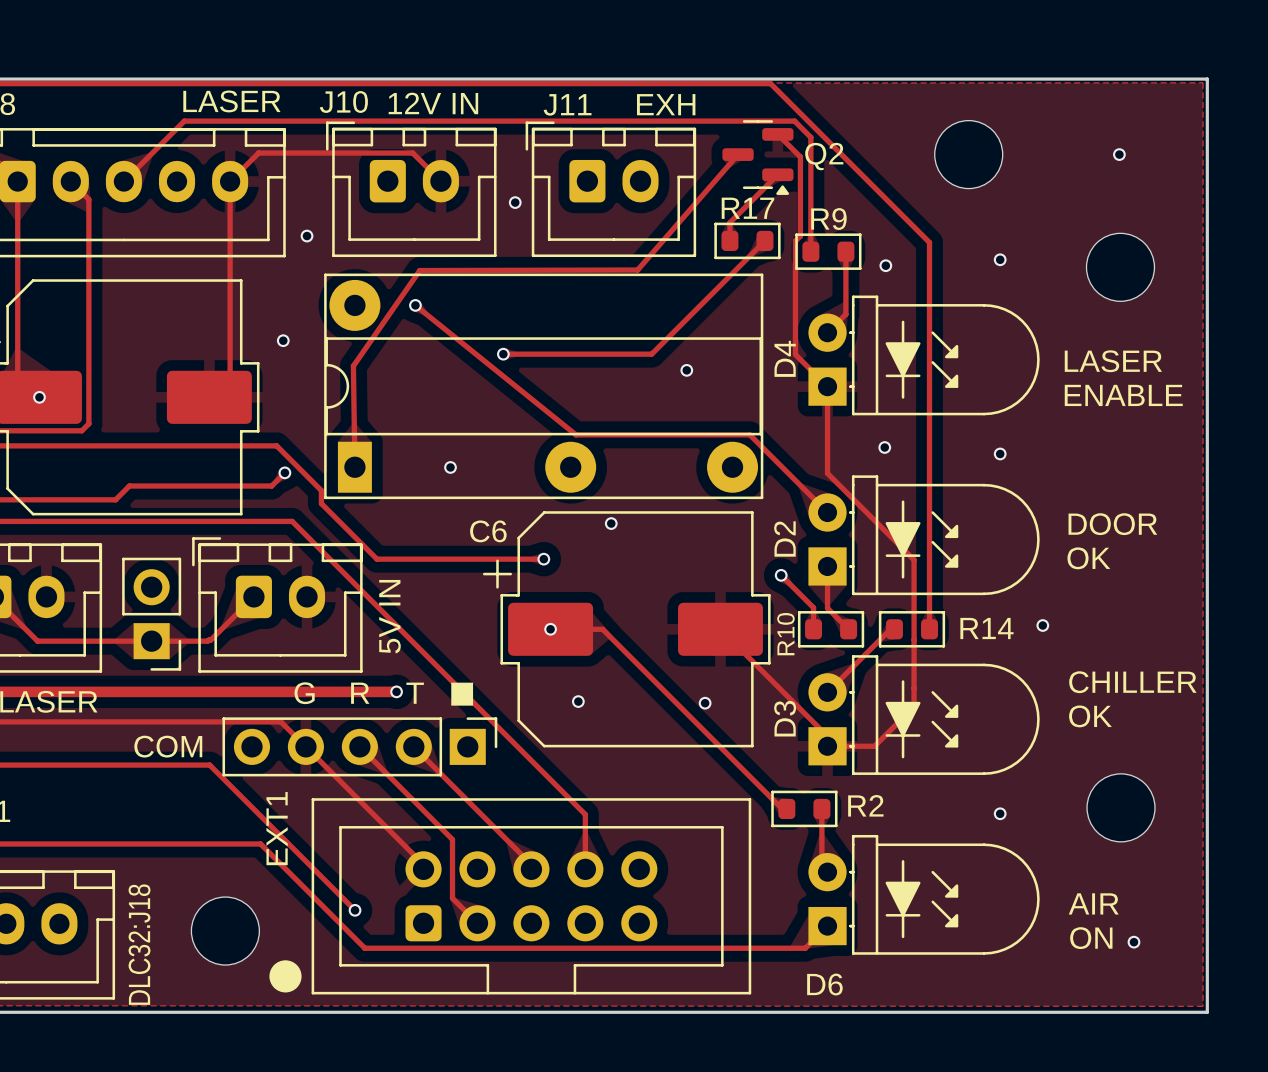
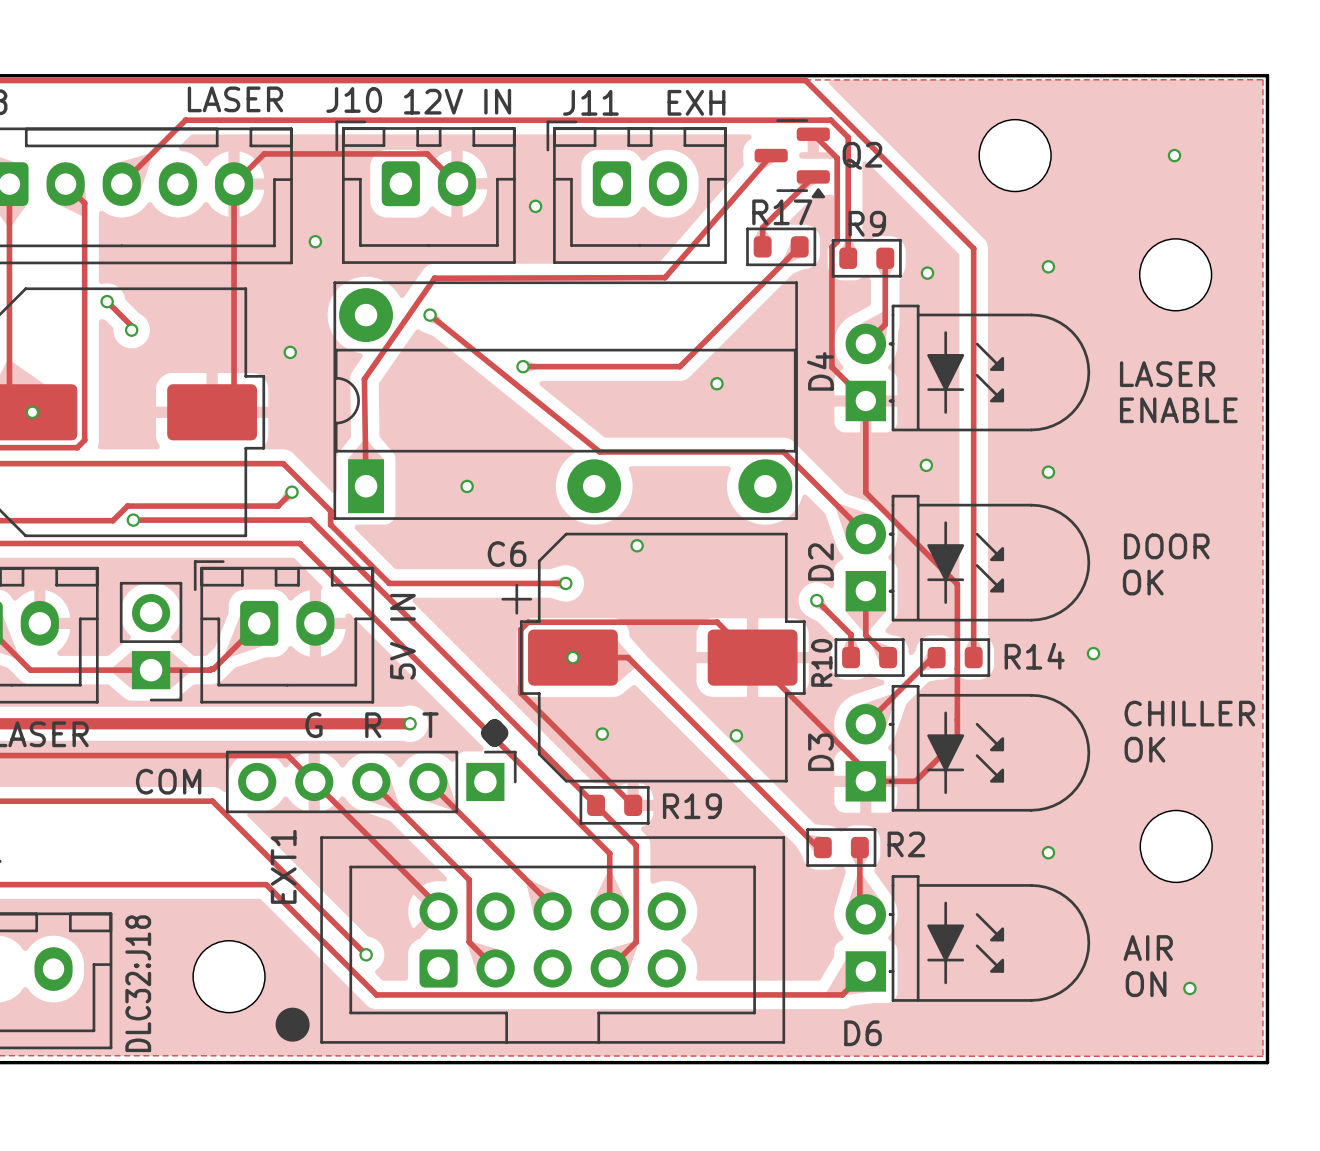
track: none -> (107, 301) (131, 326) (131, 330)
via: none -> (107, 301)
via: none -> (131, 330)
track: none -> (133, 520) (310, 520) (636, 845) (636, 942) (609, 968)
via: none -> (133, 520)
track: none -> (752, 657) (717, 622) (528, 622) (520, 629) (520, 692) (633, 805)
R19: none -> (614, 805)

